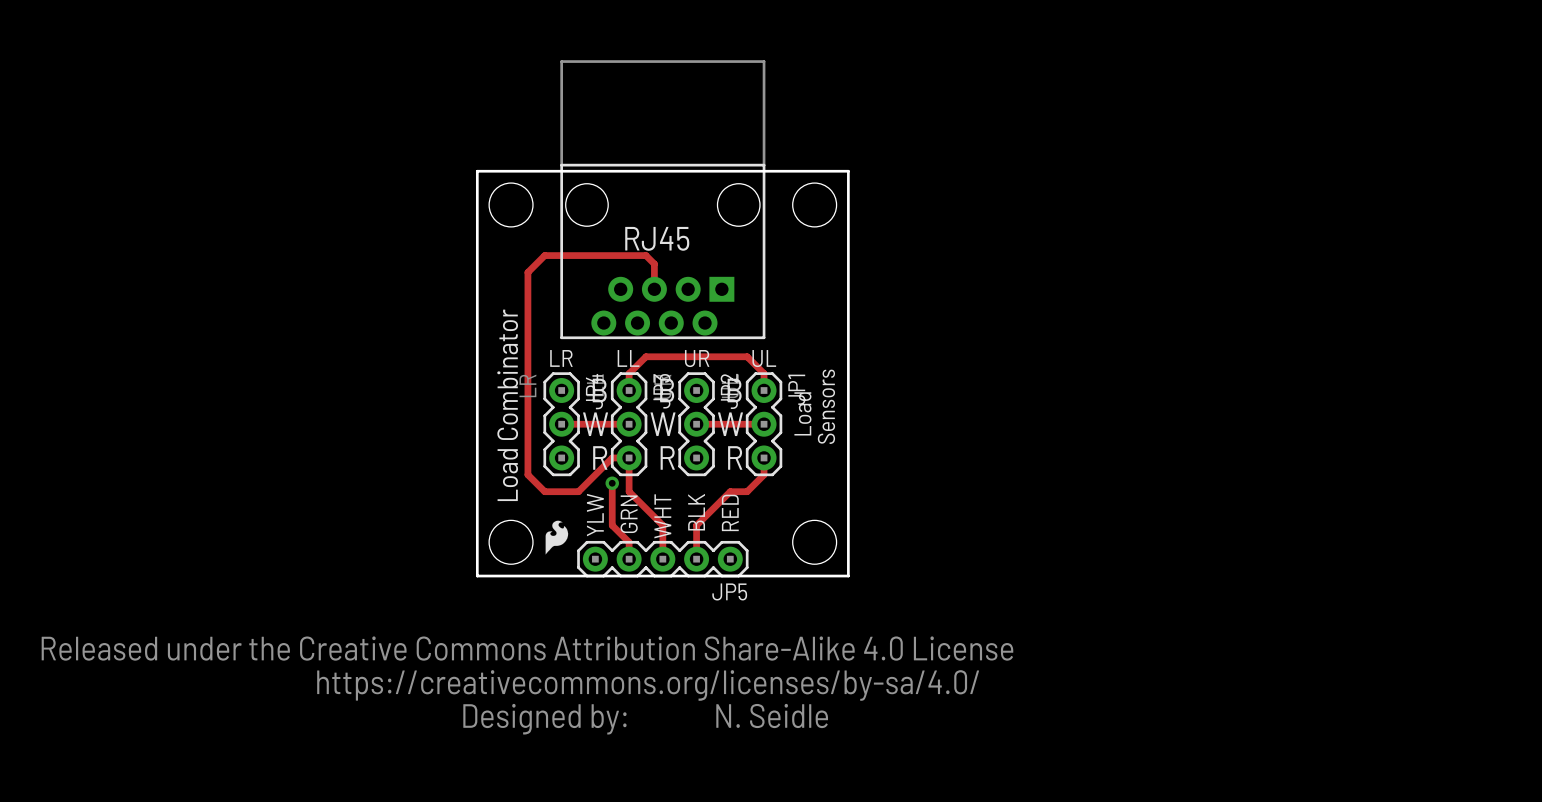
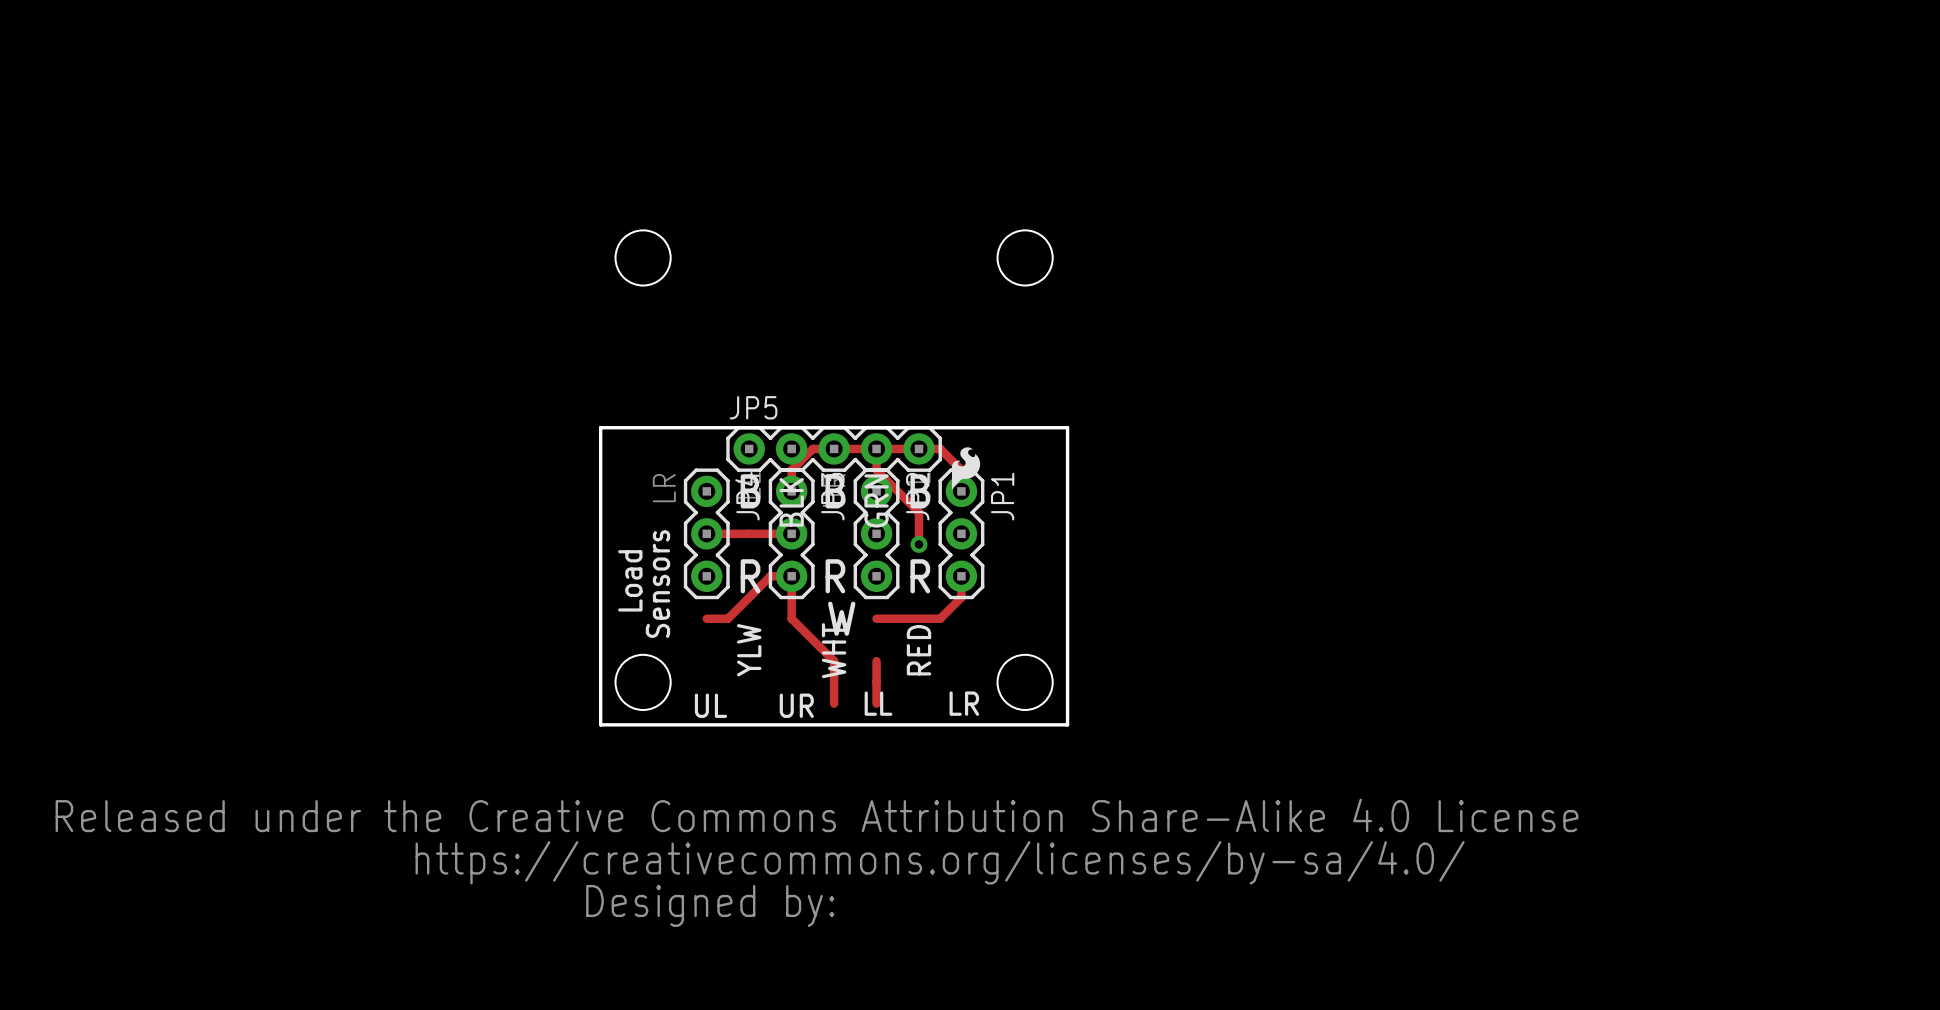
part: (662, 199) -> none
text: RJ45 (657, 238) -> none
track: (654, 289) (654, 264) (645, 255) (544, 255) (527, 272) (527, 474) (544, 491) (561, 491) -> none
board edge: (477, 339) (477, 171) (848, 171) (848, 339) -> (600, 427) (1067, 427)
drawing: none -> [951, 447, 981, 490]
track: none -> (876, 448) (876, 470) (919, 512) (919, 544)
text position: LR (561, 358) -> LR (964, 703)
text position: LL (628, 358) -> LL (878, 703)
text position: UR (697, 358) -> UR (796, 705)
text position: UL (764, 358) -> UL (710, 705)
text: Load Combinator (507, 405) -> none
text position: Sensors (826, 406) -> Sensors (657, 584)
text position: Load (802, 413) -> Load (630, 580)
text: W (595, 424) -> none
text: W (663, 424) -> none
track: (696, 424) (764, 424) -> none
text: W (730, 424) -> none
via: none -> (919, 544)
track: (612, 483) (612, 525) (629, 542) (629, 559) -> none
via: (612, 483) -> none
text: none -> W (841, 618)
track: (730, 491) (696, 525) -> (919, 618) (876, 618)
text position: BLK (696, 512) -> BLK (791, 502)
text position: GRN (629, 514) -> GRN (876, 500)
drawing: [545, 520, 569, 555] -> none
JP5 position: (662, 559) -> (834, 448)
JP5 name position: JP5 (729, 591) -> JP5 (753, 407)
text: N. Seidle (772, 715) -> none

